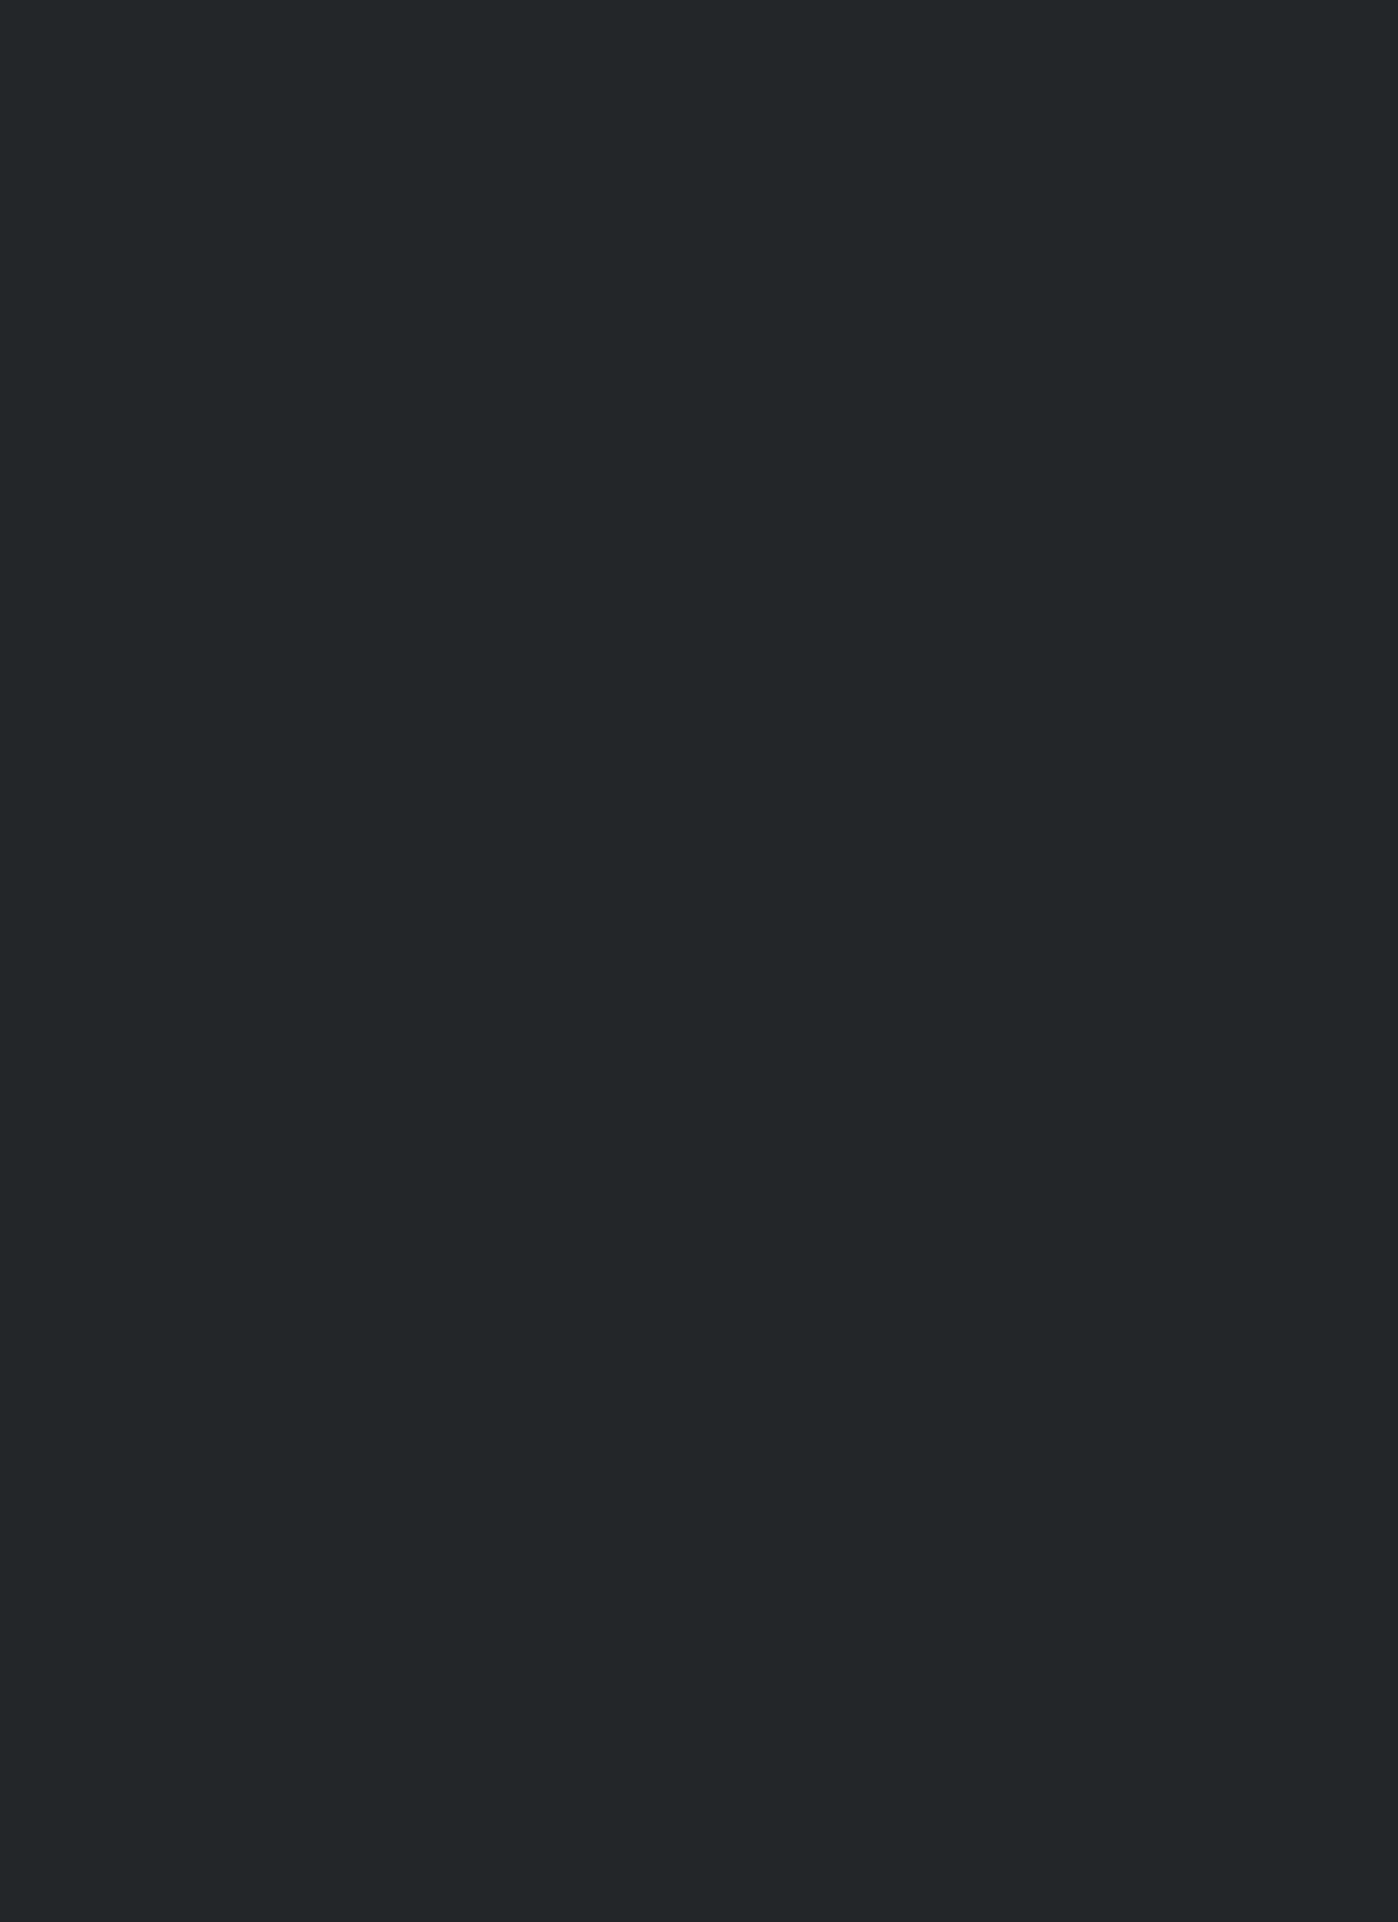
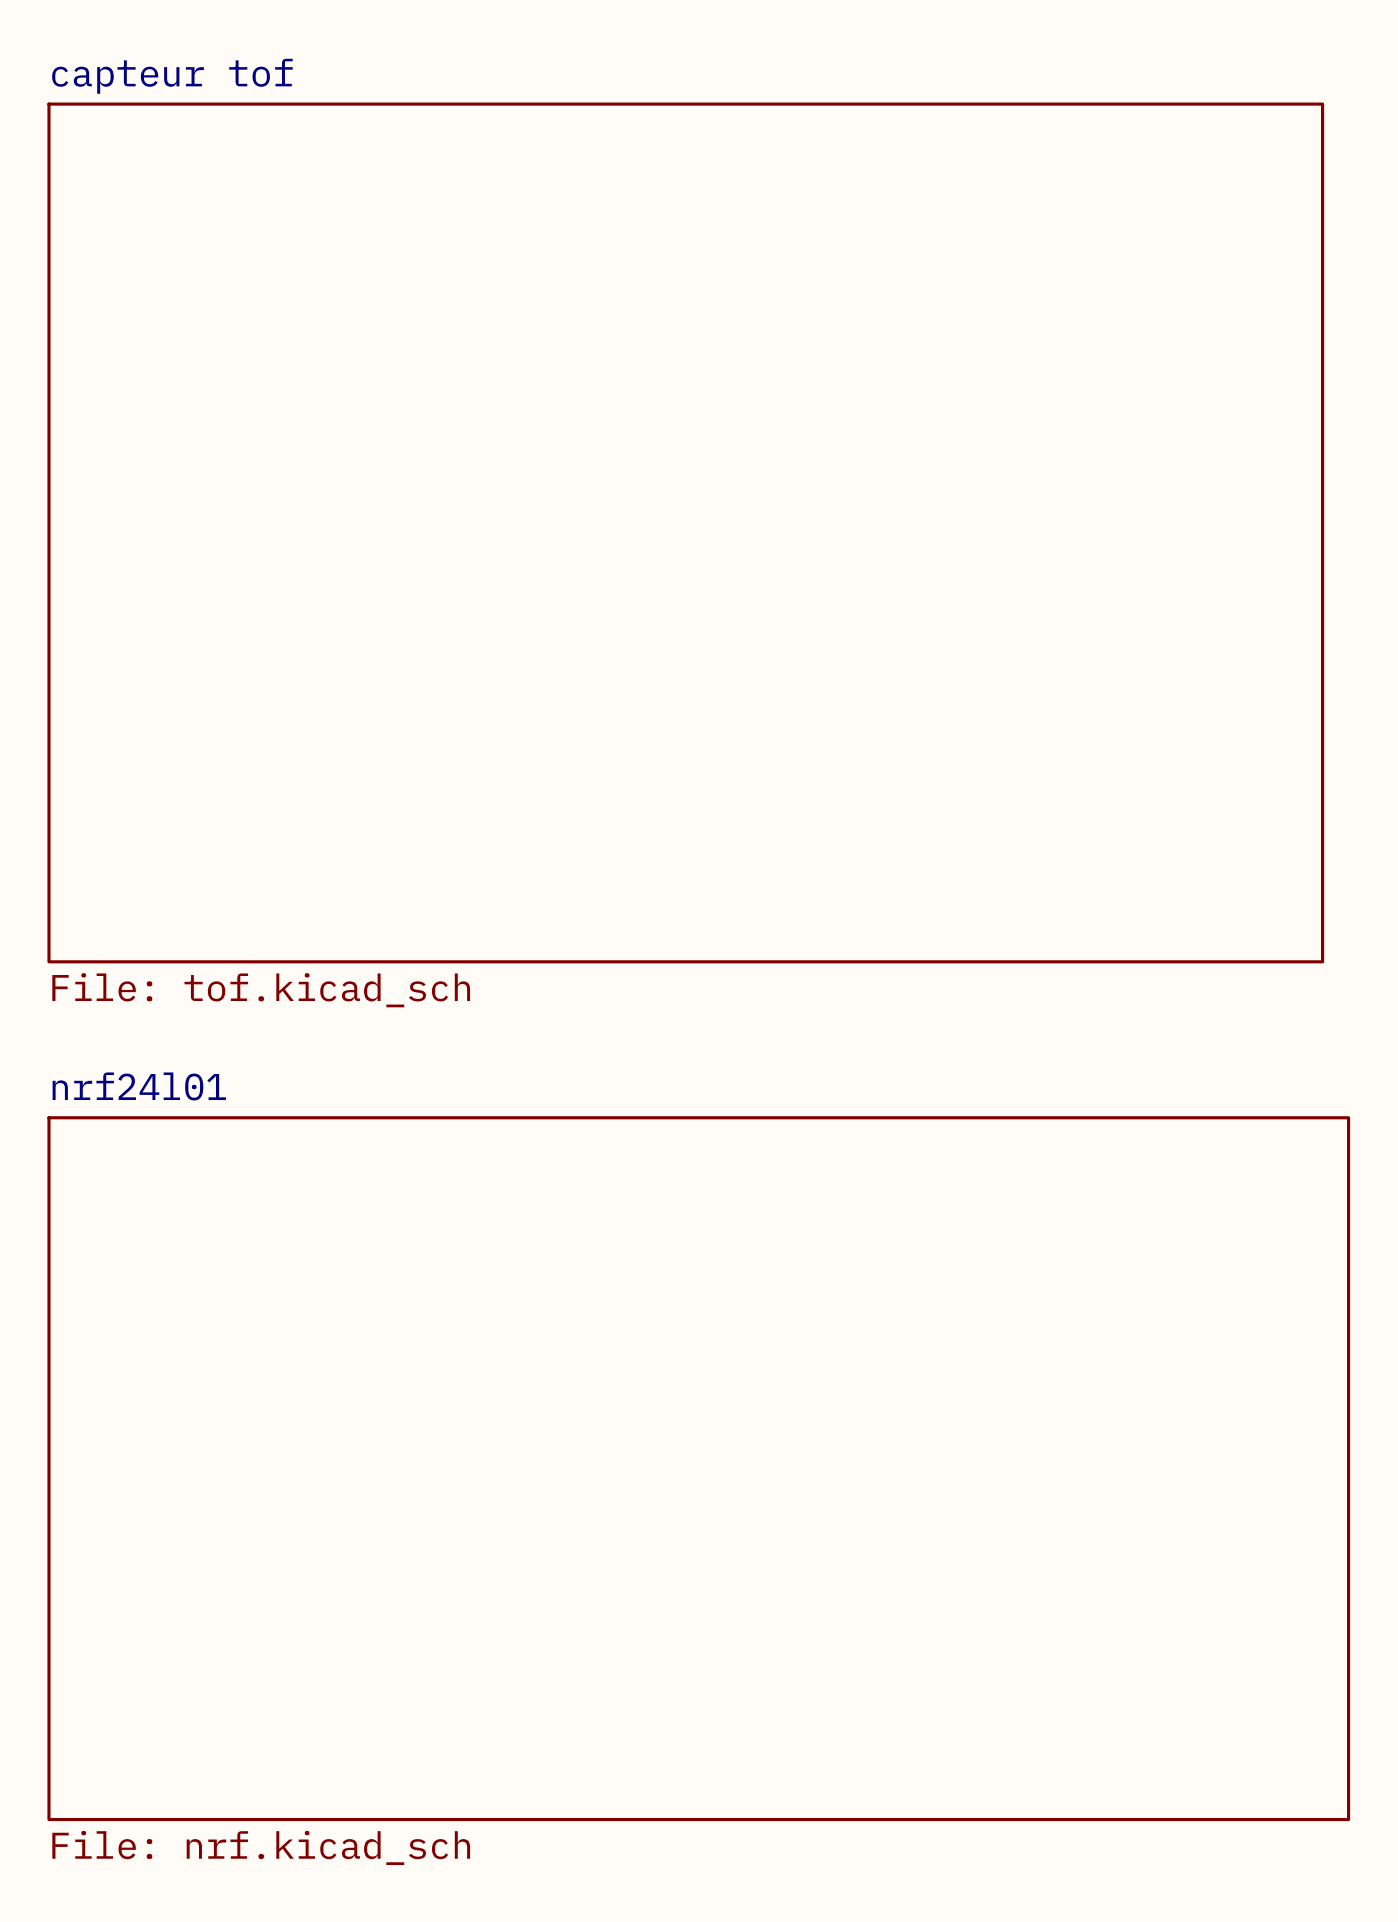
sheet capteur tof: none -> File: tof.kicad_sch (685, 532)
sheet nrf24l01: none -> File: nrf.kicad_sch (698, 1468)

